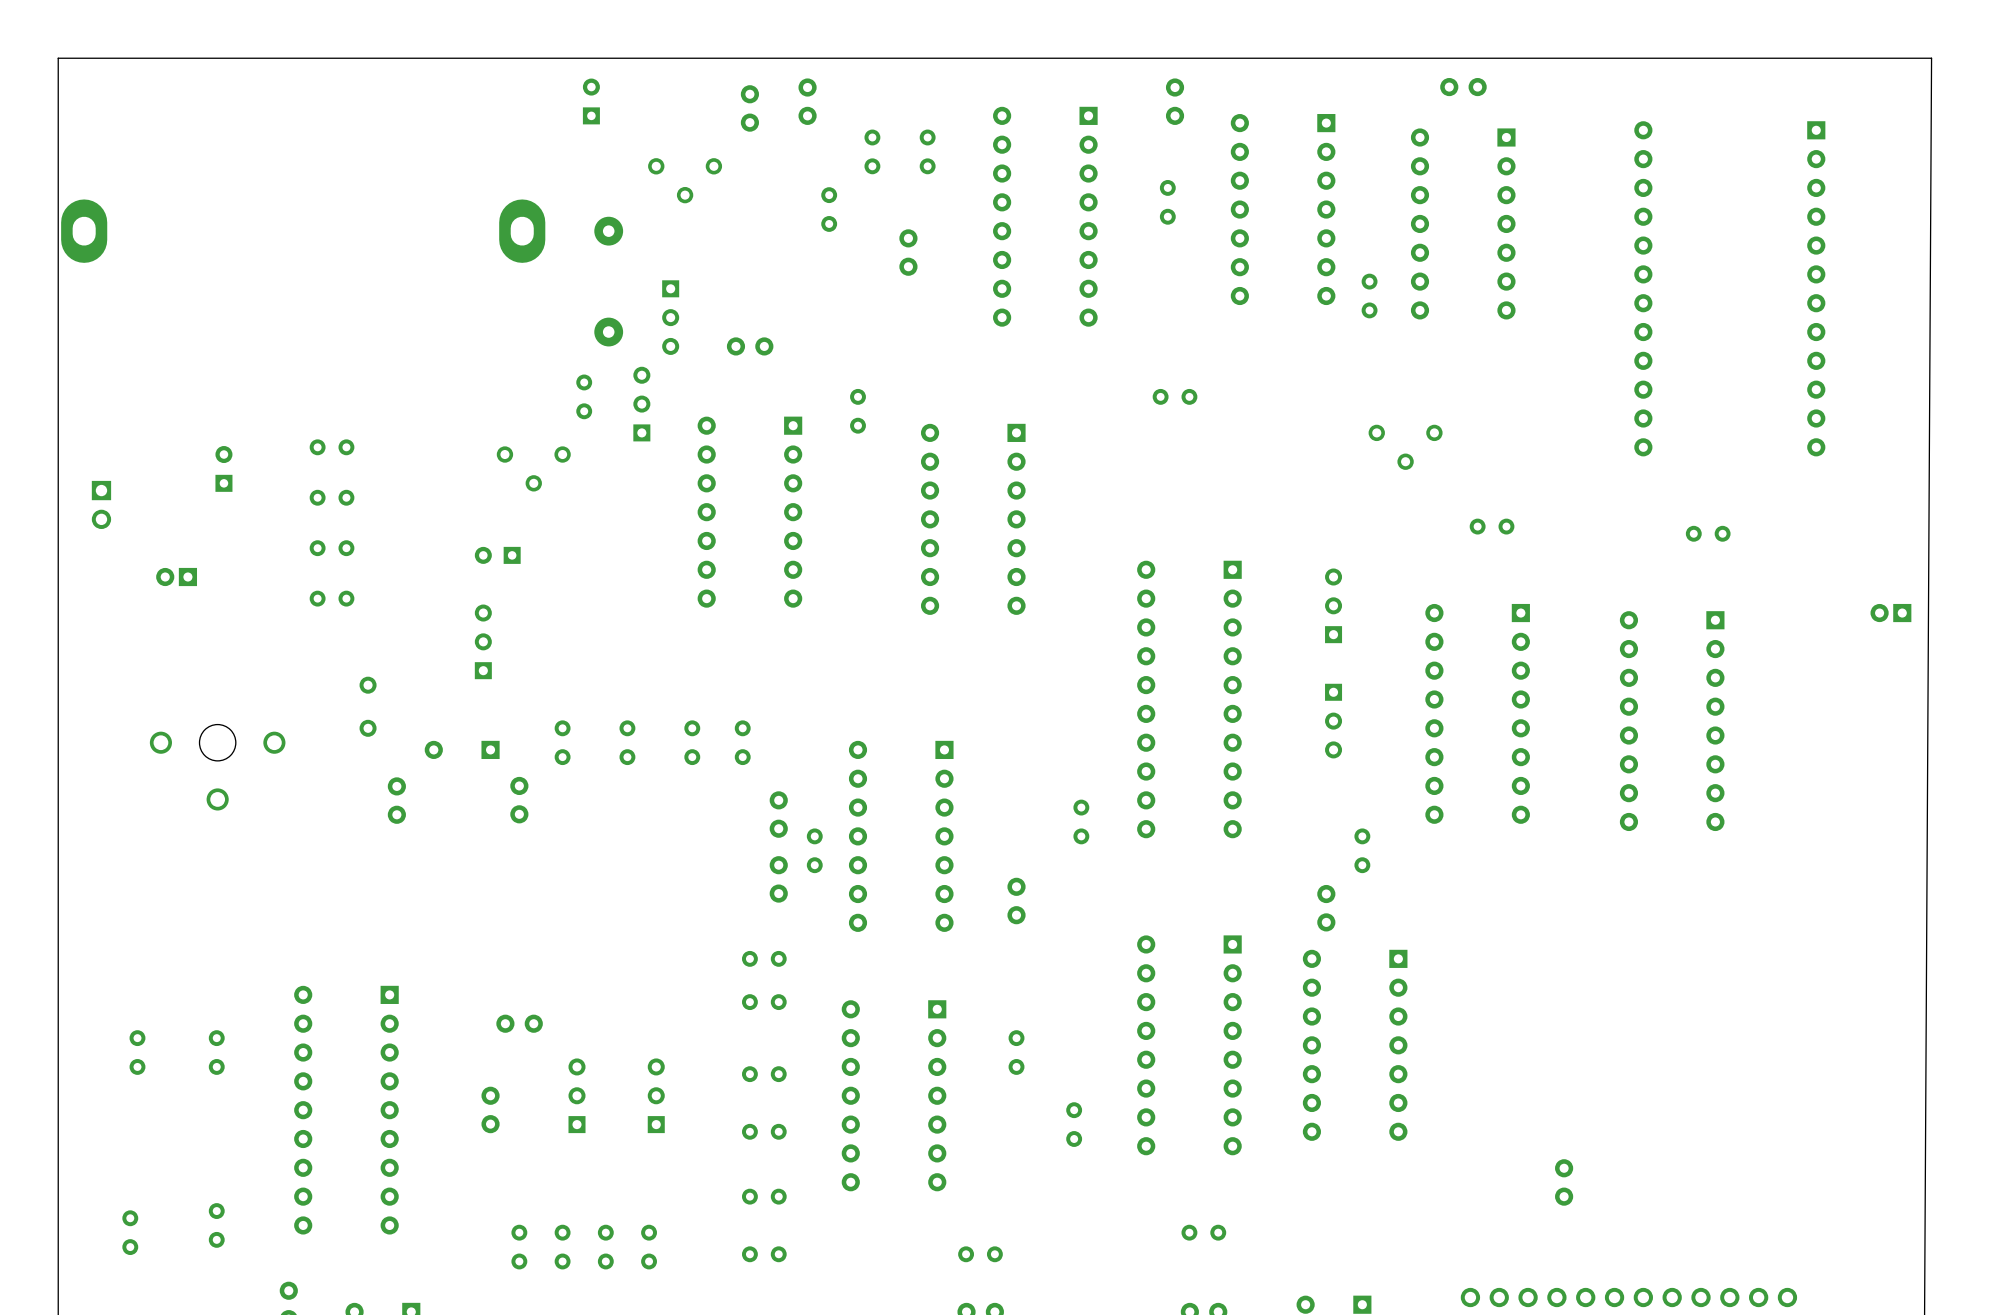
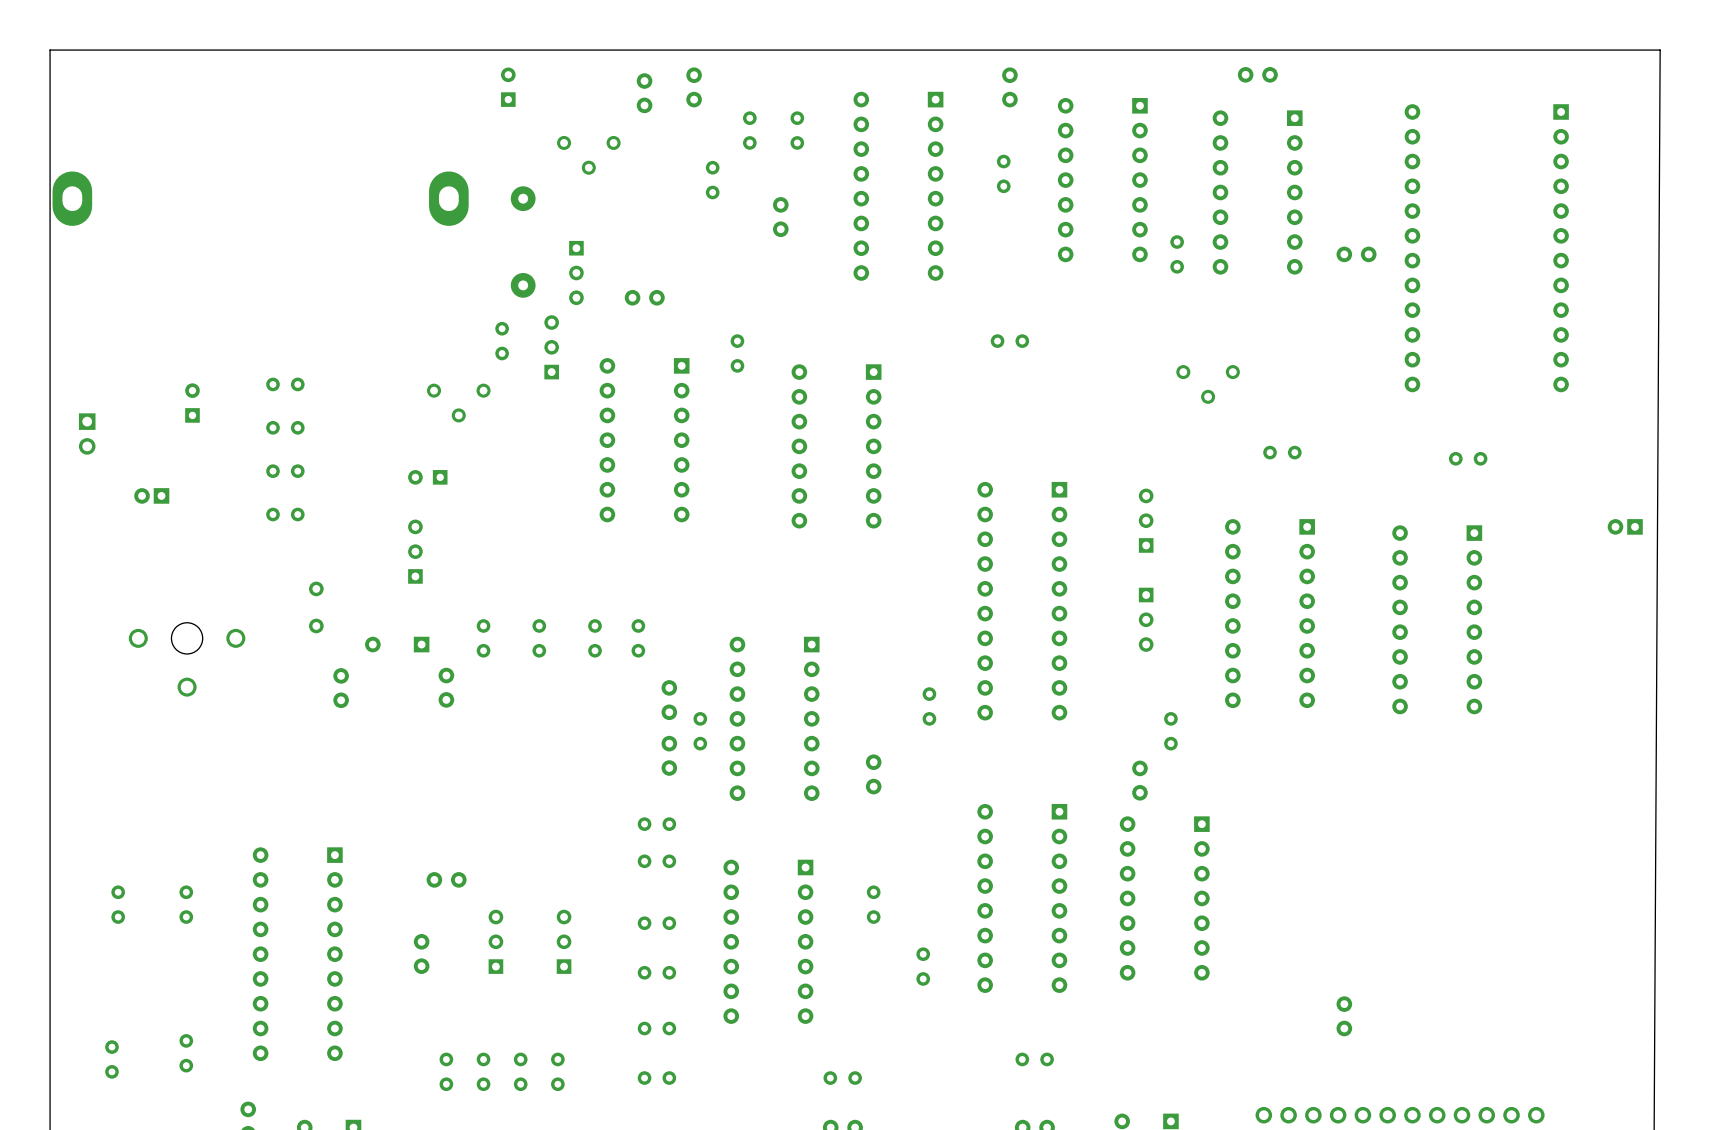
part: none -> (1356, 254)

